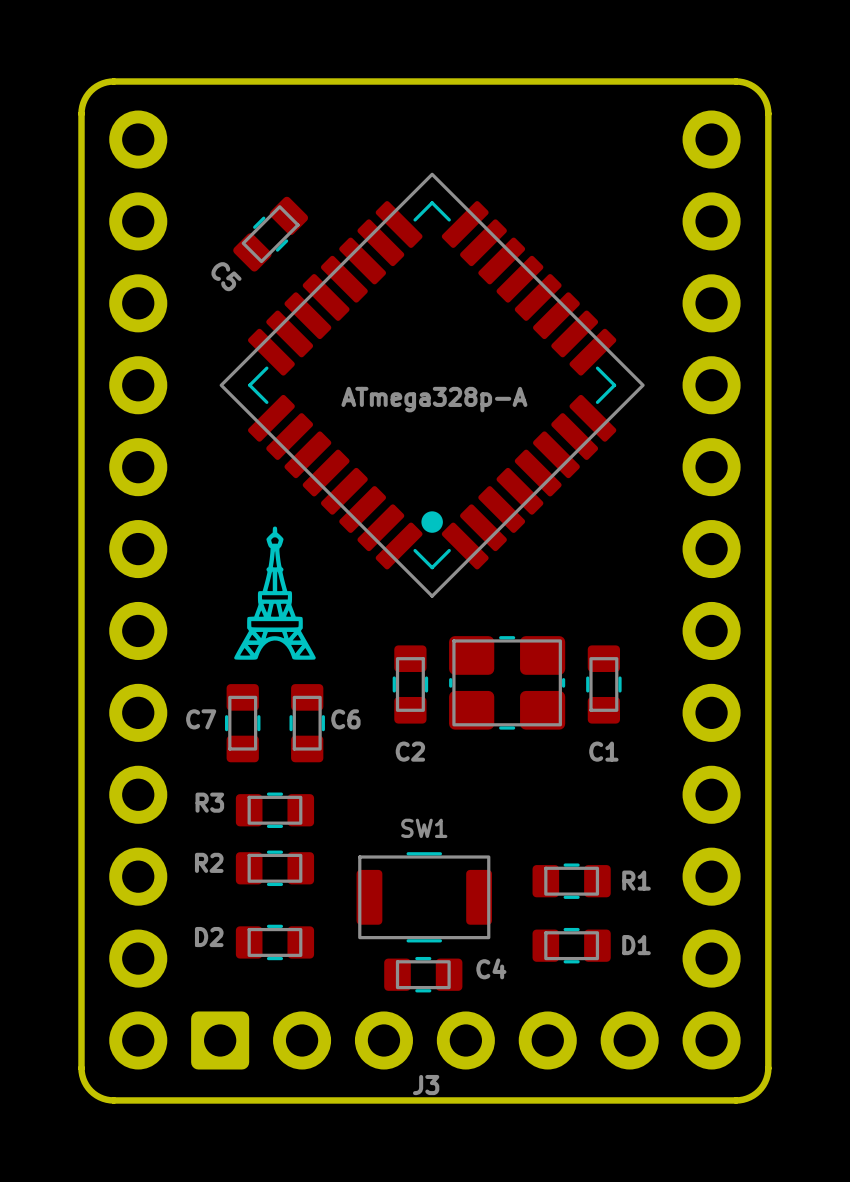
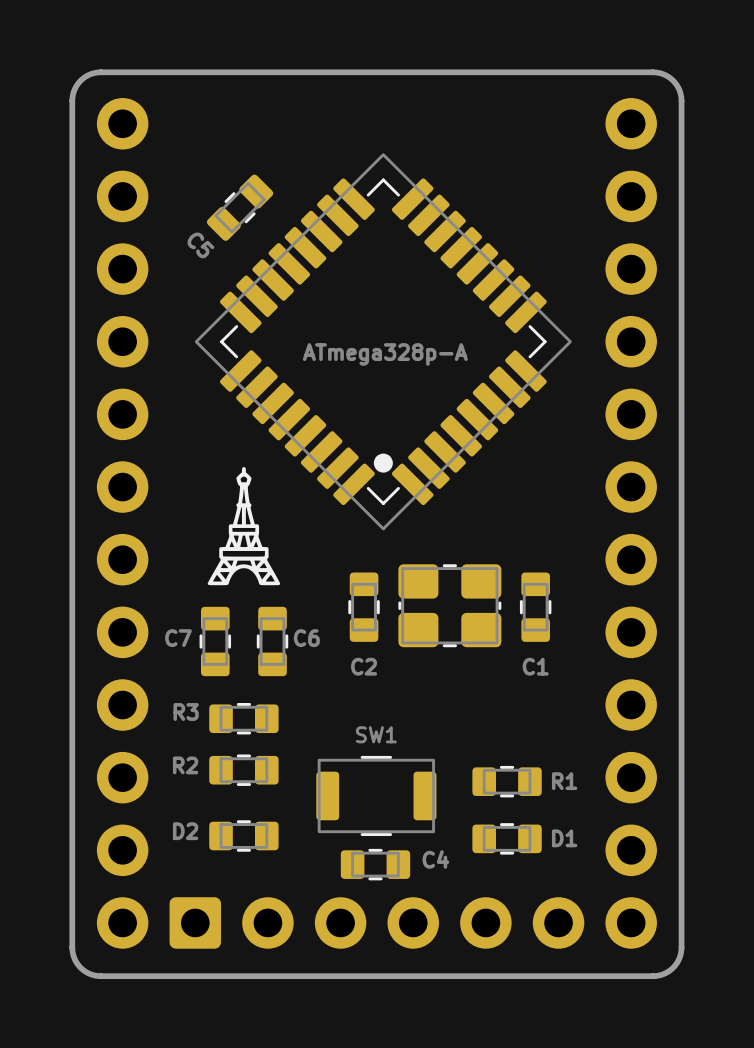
J3 name: J3 (426, 1085) -> none

